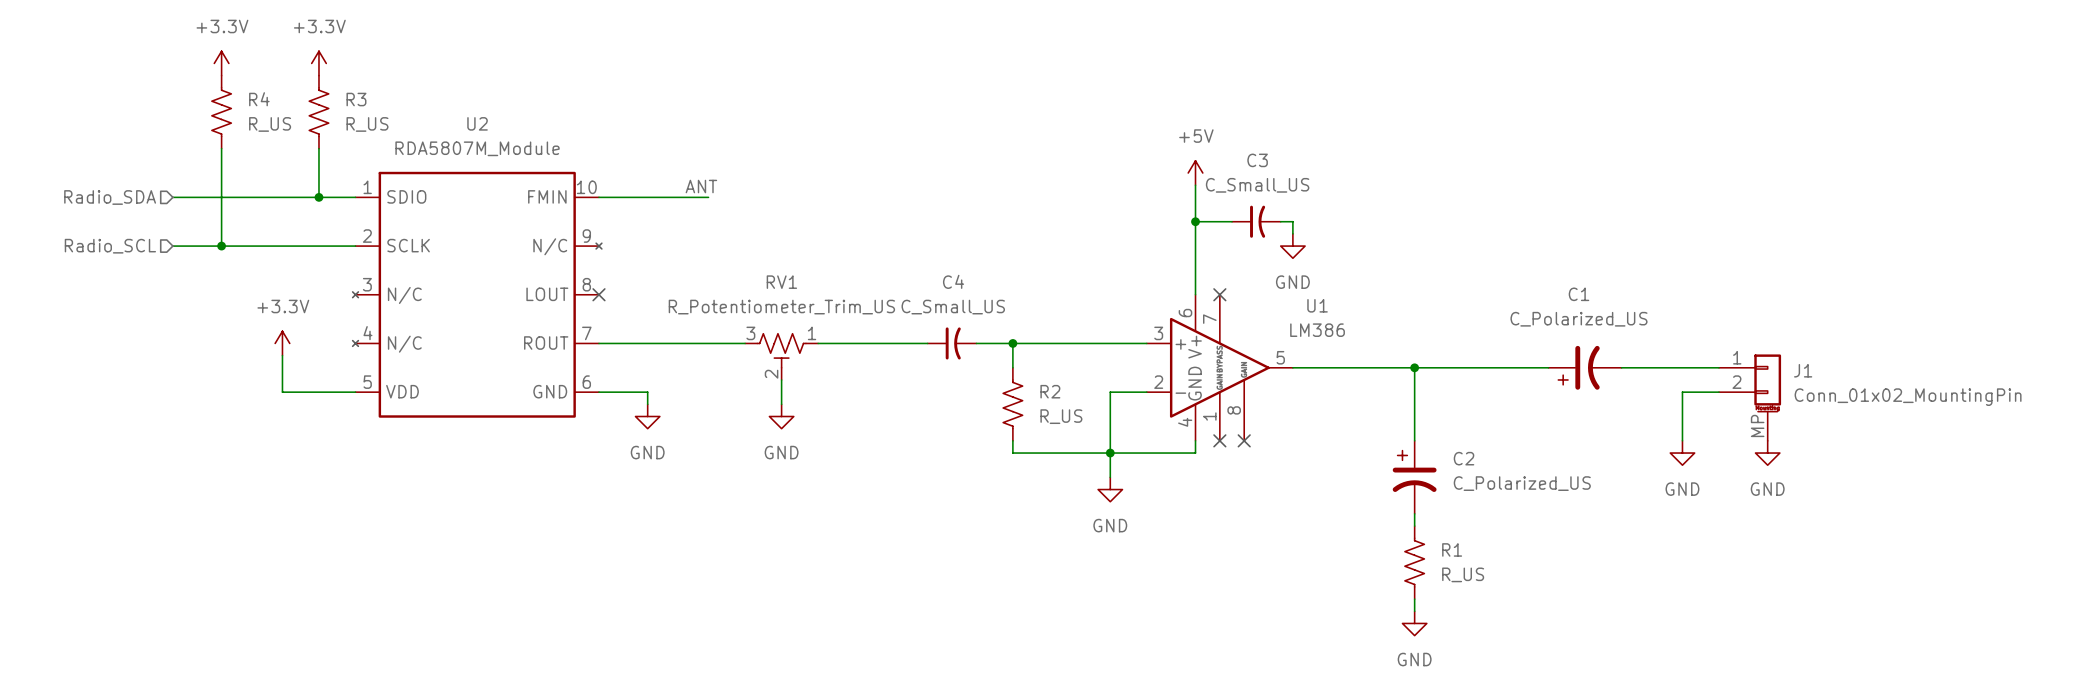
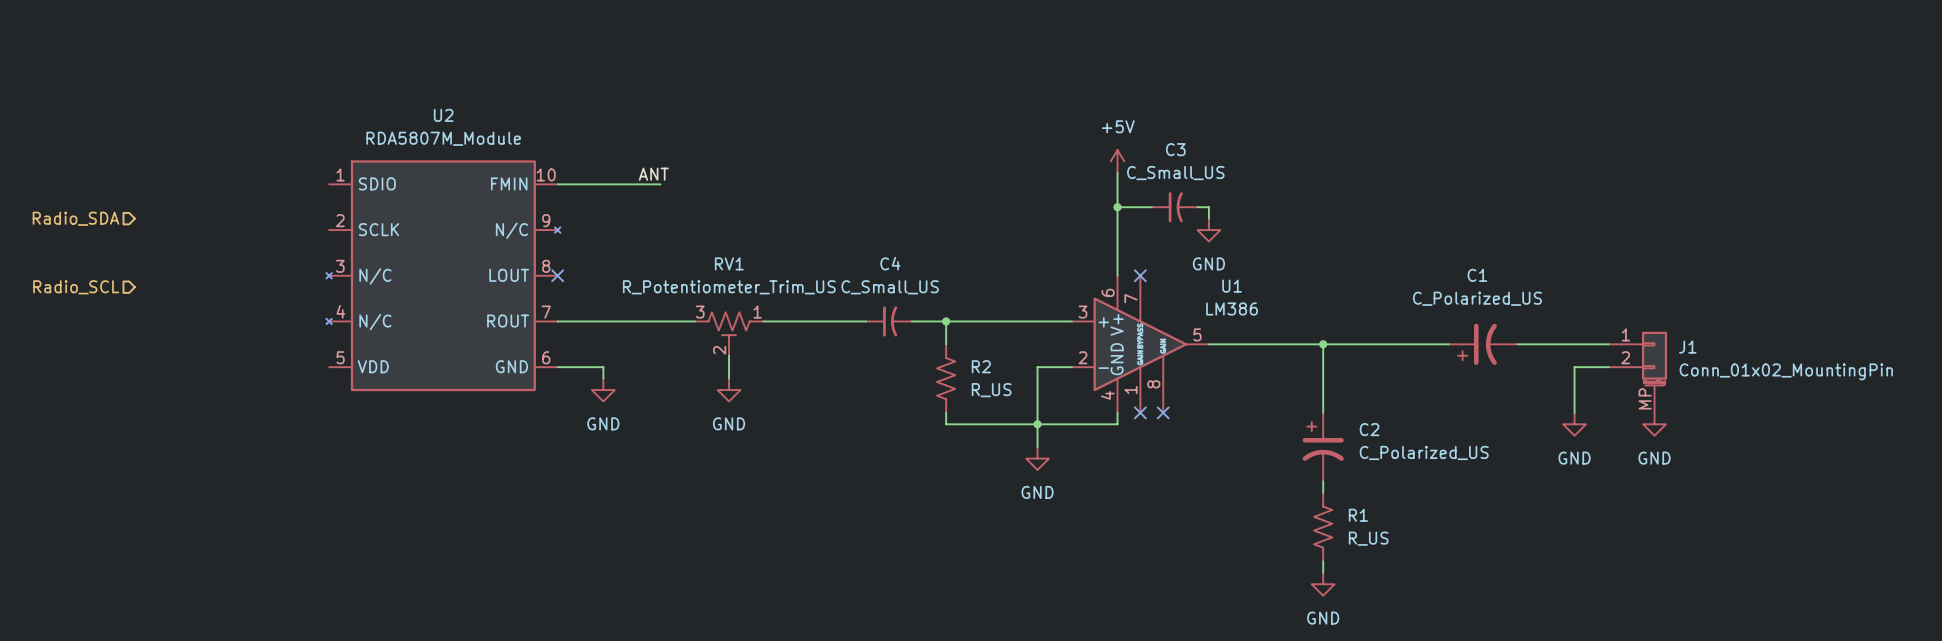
power symbol: +3.3V (221, 63) -> none
power symbol: +3.3V (318, 63) -> none
R4: R_US (221, 112) -> none
R3: R_US (318, 112) -> none
wire: (221, 148) (221, 246) -> none
wire: (318, 148) (318, 197) -> none
hierarchical label position: Radio_SDA (110, 197) -> Radio_SDA (75, 218)
wire: (172, 197) (355, 197) -> none
junction: (318, 197) -> none
hierarchical label position: Radio_SCL (110, 246) -> Radio_SCL (76, 287)
wire: (172, 246) (355, 246) -> none
junction: (221, 246) -> none
power symbol: +3.3V (282, 343) -> none
wire: (282, 355) (282, 392) (355, 392) -> none

